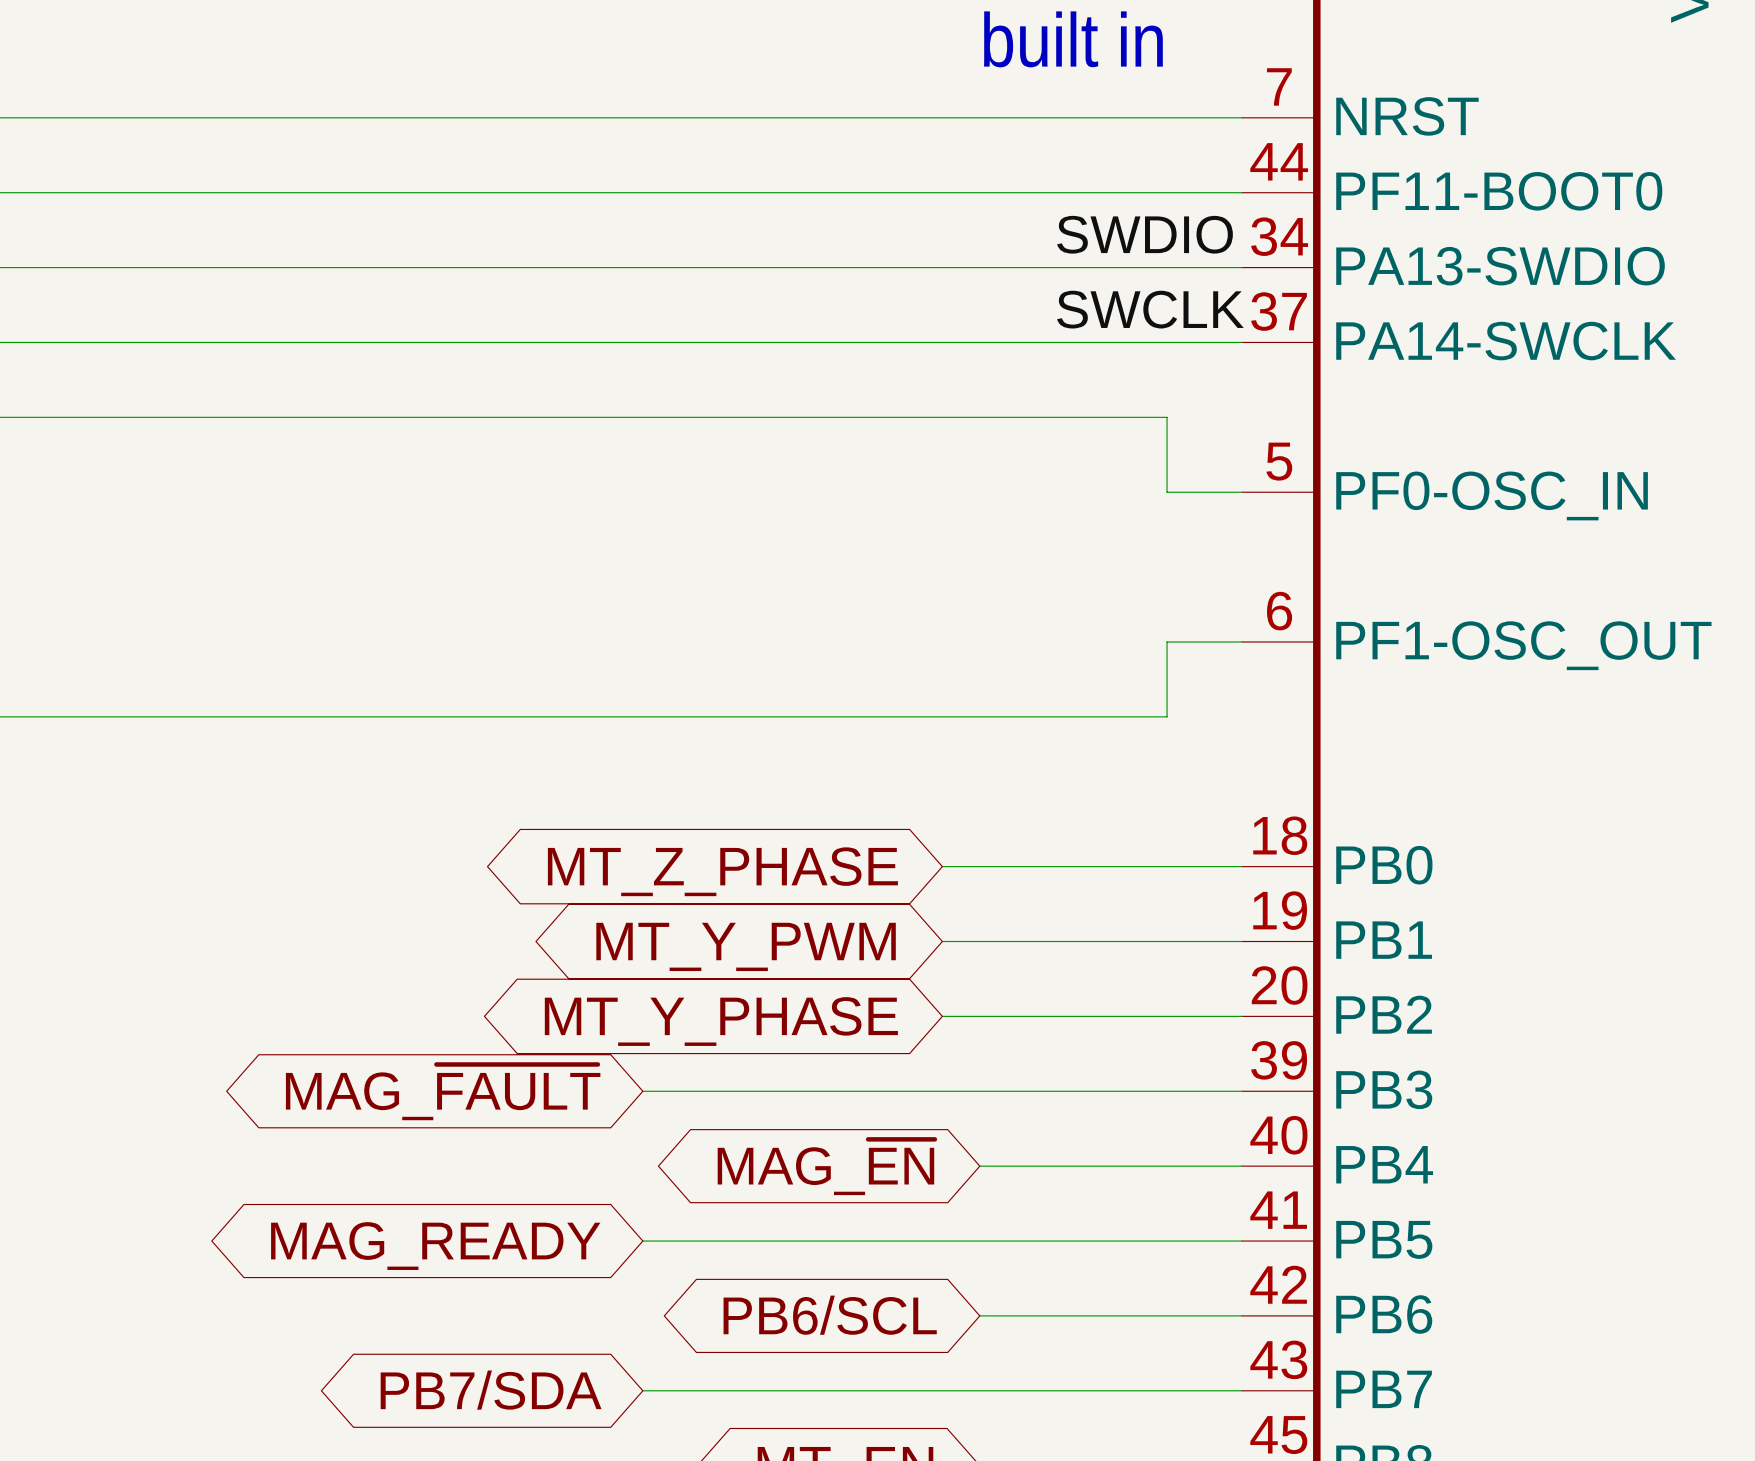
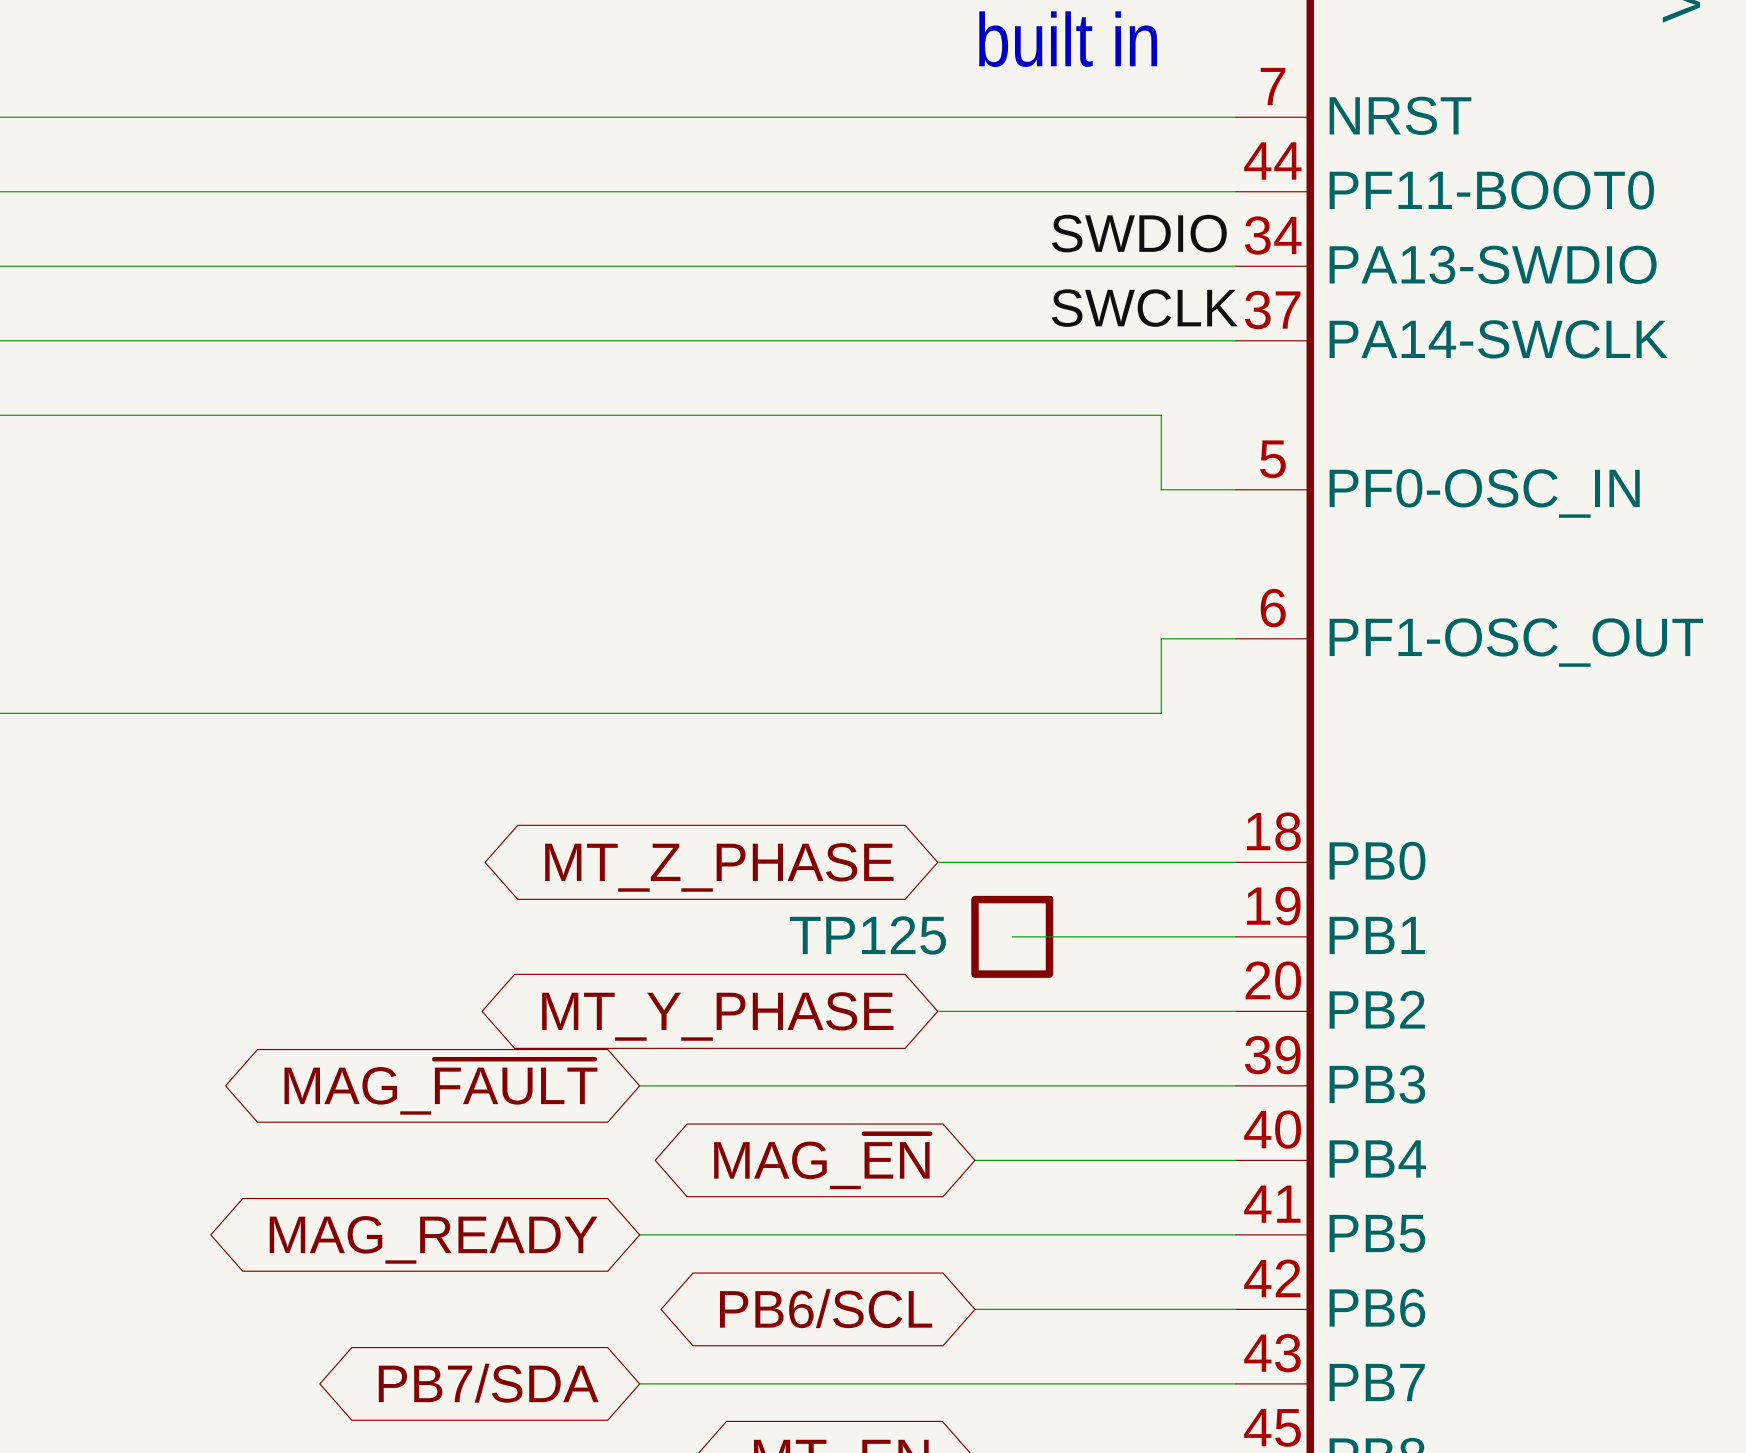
wire: (942, 941) (1017, 941) -> none
TP125: none -> (1012, 936)
global label: MT_Y_PWM (746, 946) -> none

